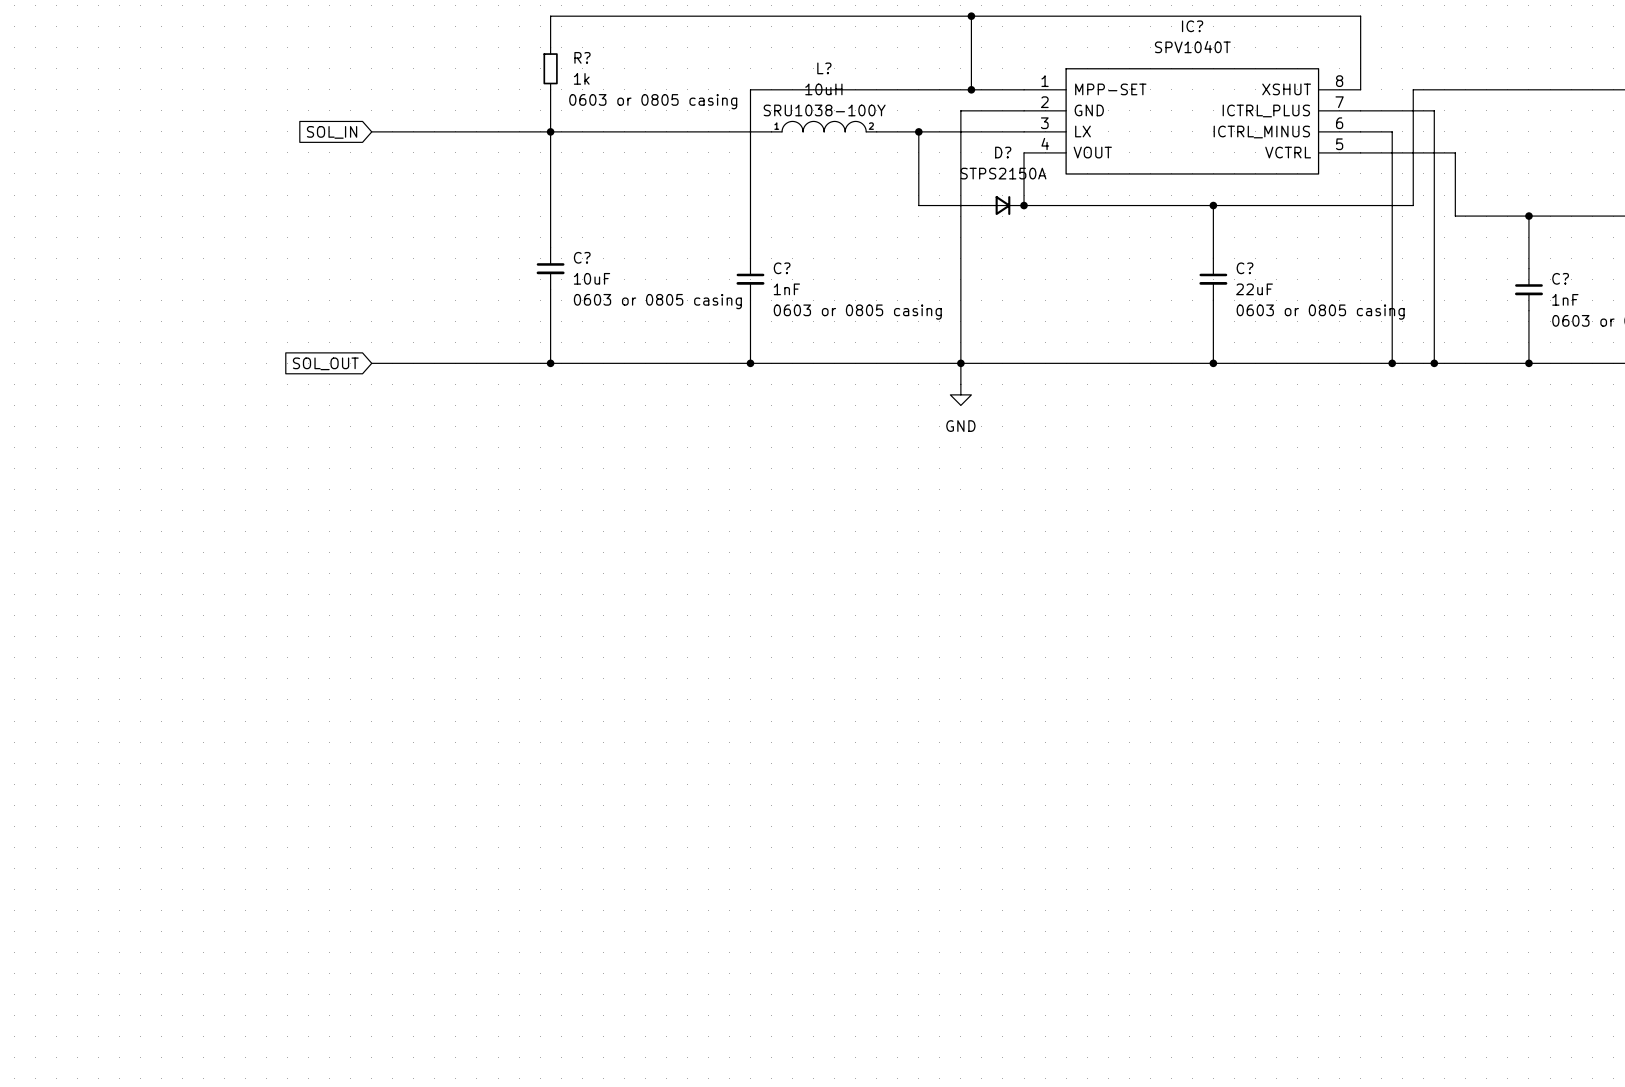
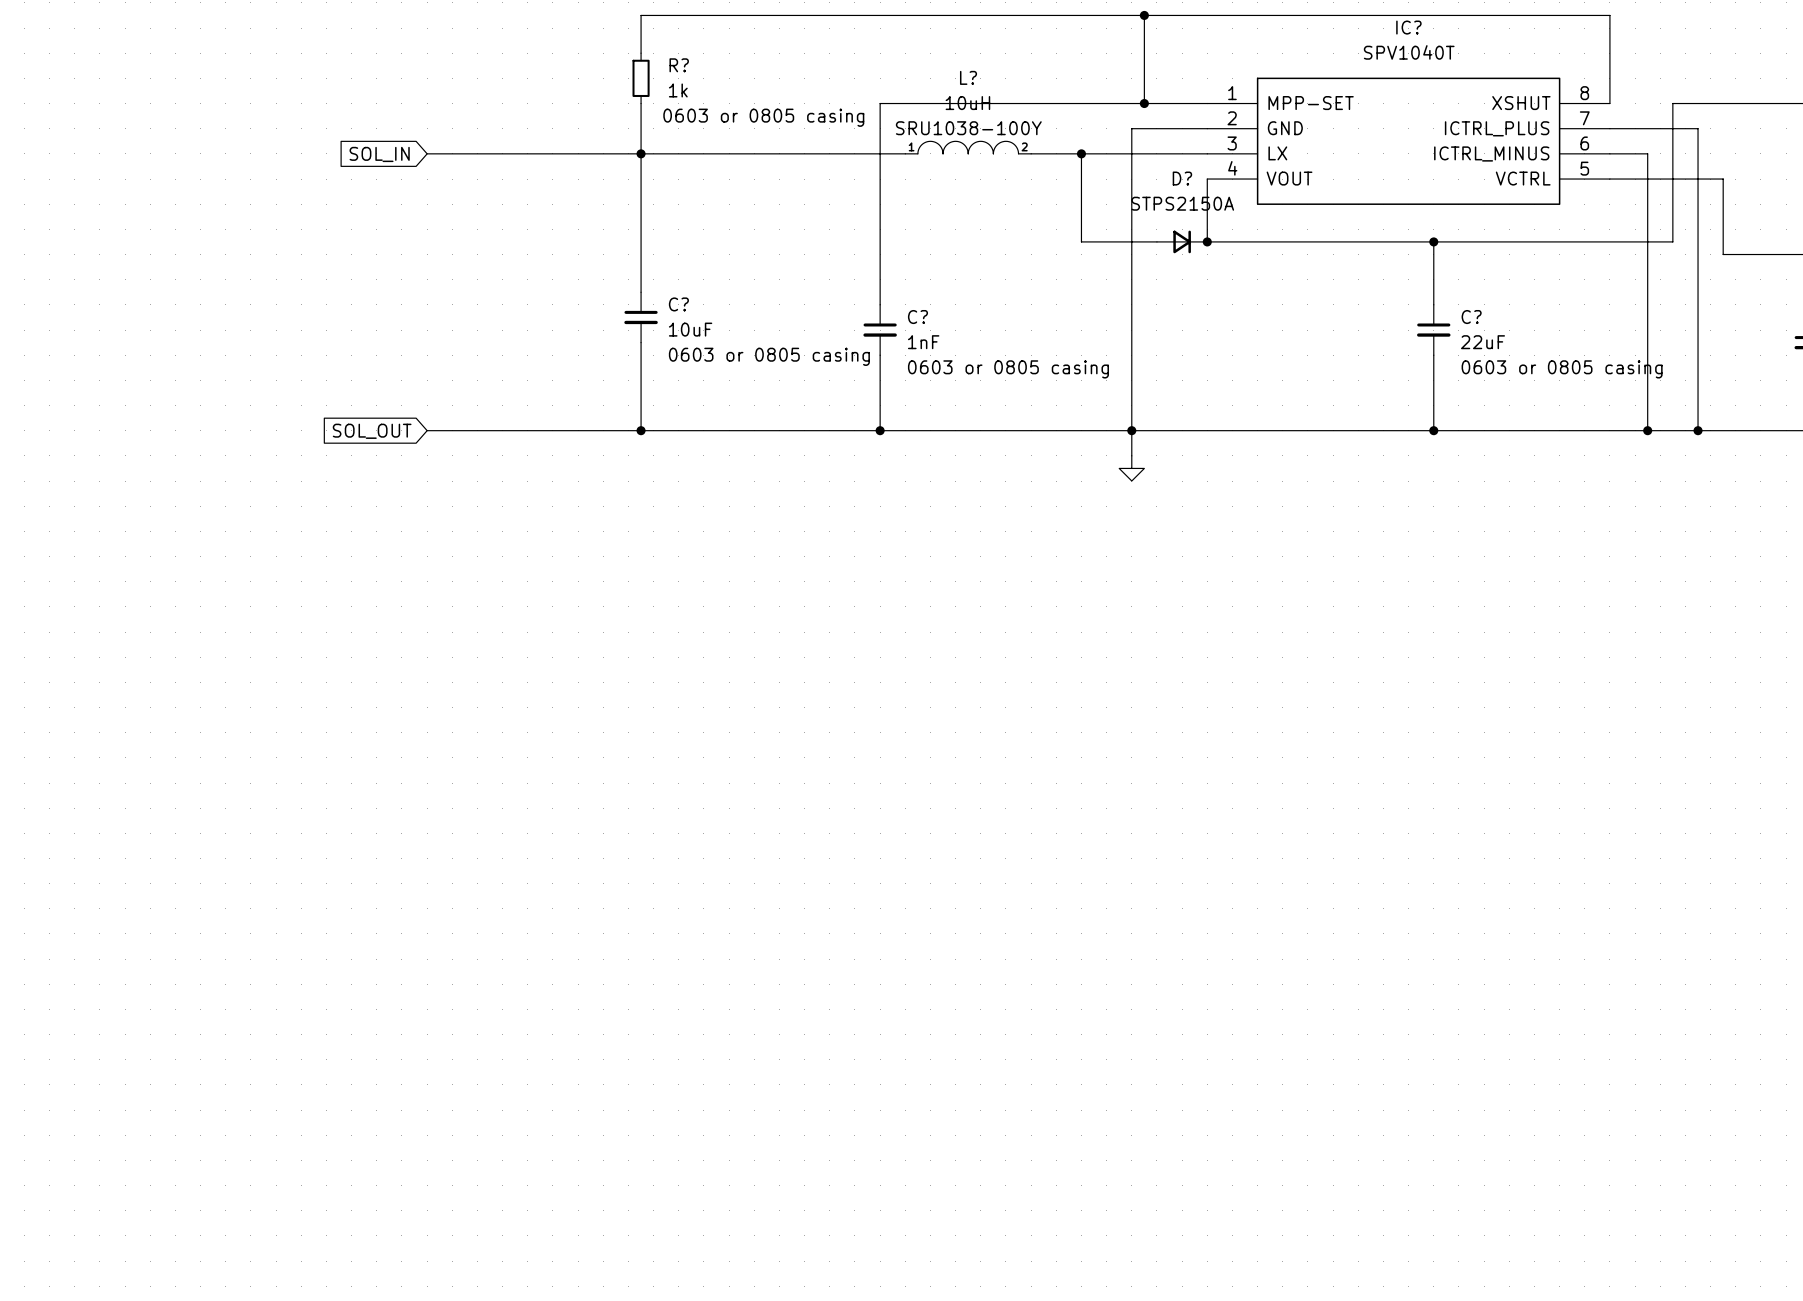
power symbol text: GND (960, 426) -> none

